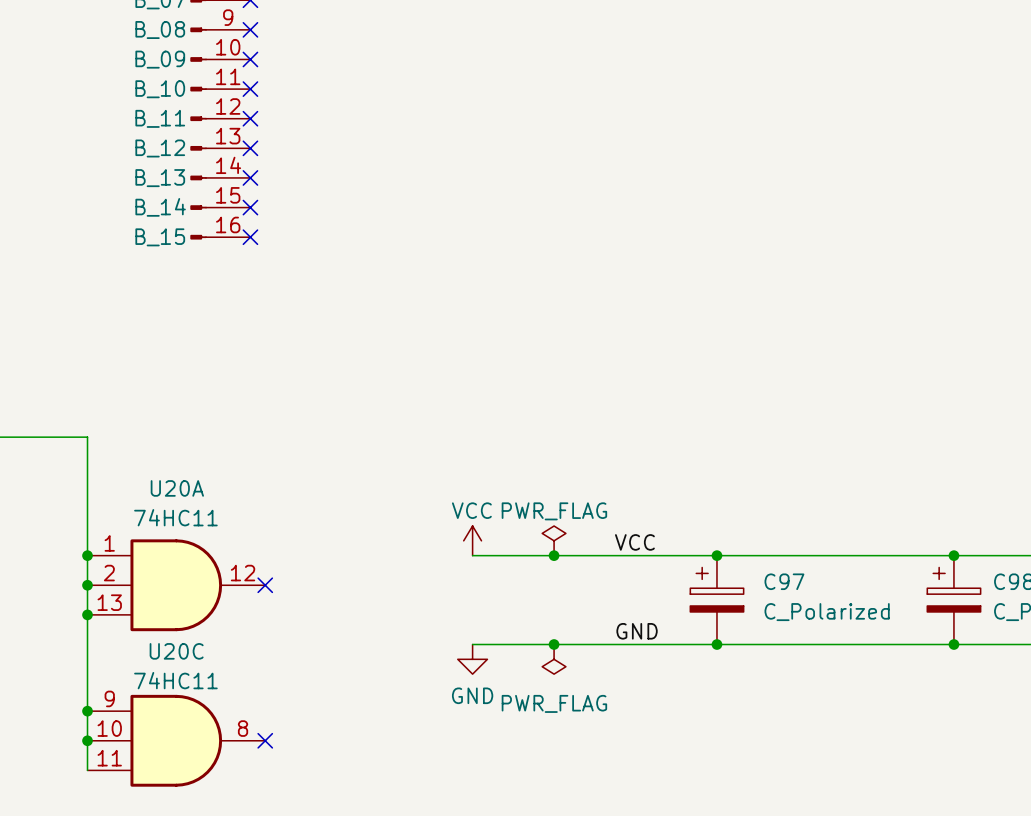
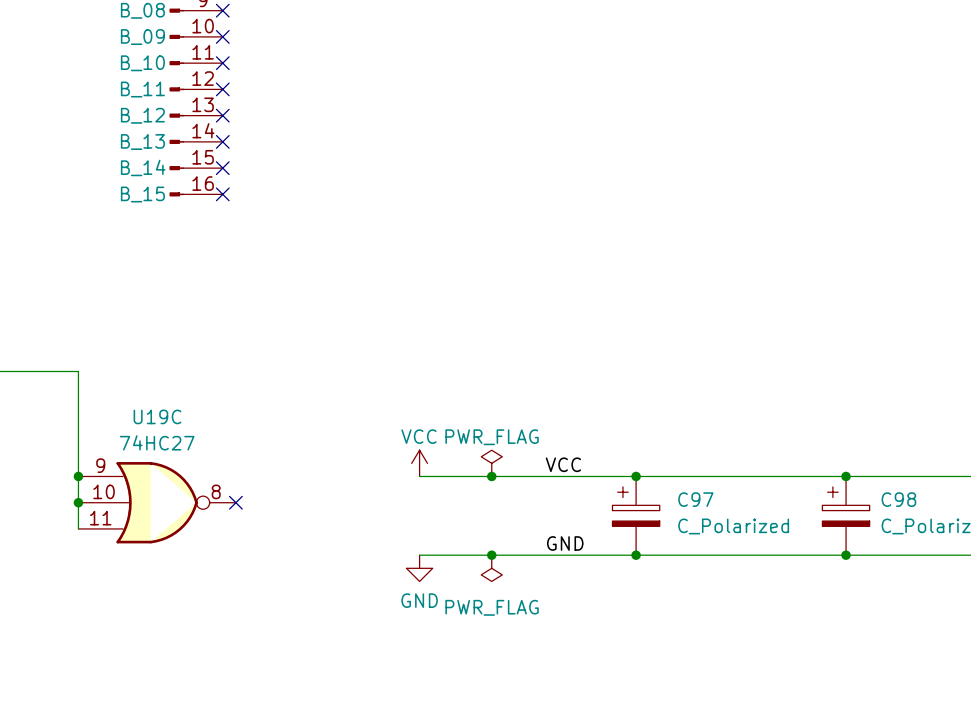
U20A: 74HC11 (176, 585) -> none
U19C: none -> 74HC27 (157, 502)
wire: (87, 614) (87, 770) -> none
junction: (87, 614) -> none
junction: (87, 711) -> none
junction: (87, 740) -> none
U20C: 74HC11 (176, 740) -> none
no-connect mark: (265, 740) -> none

